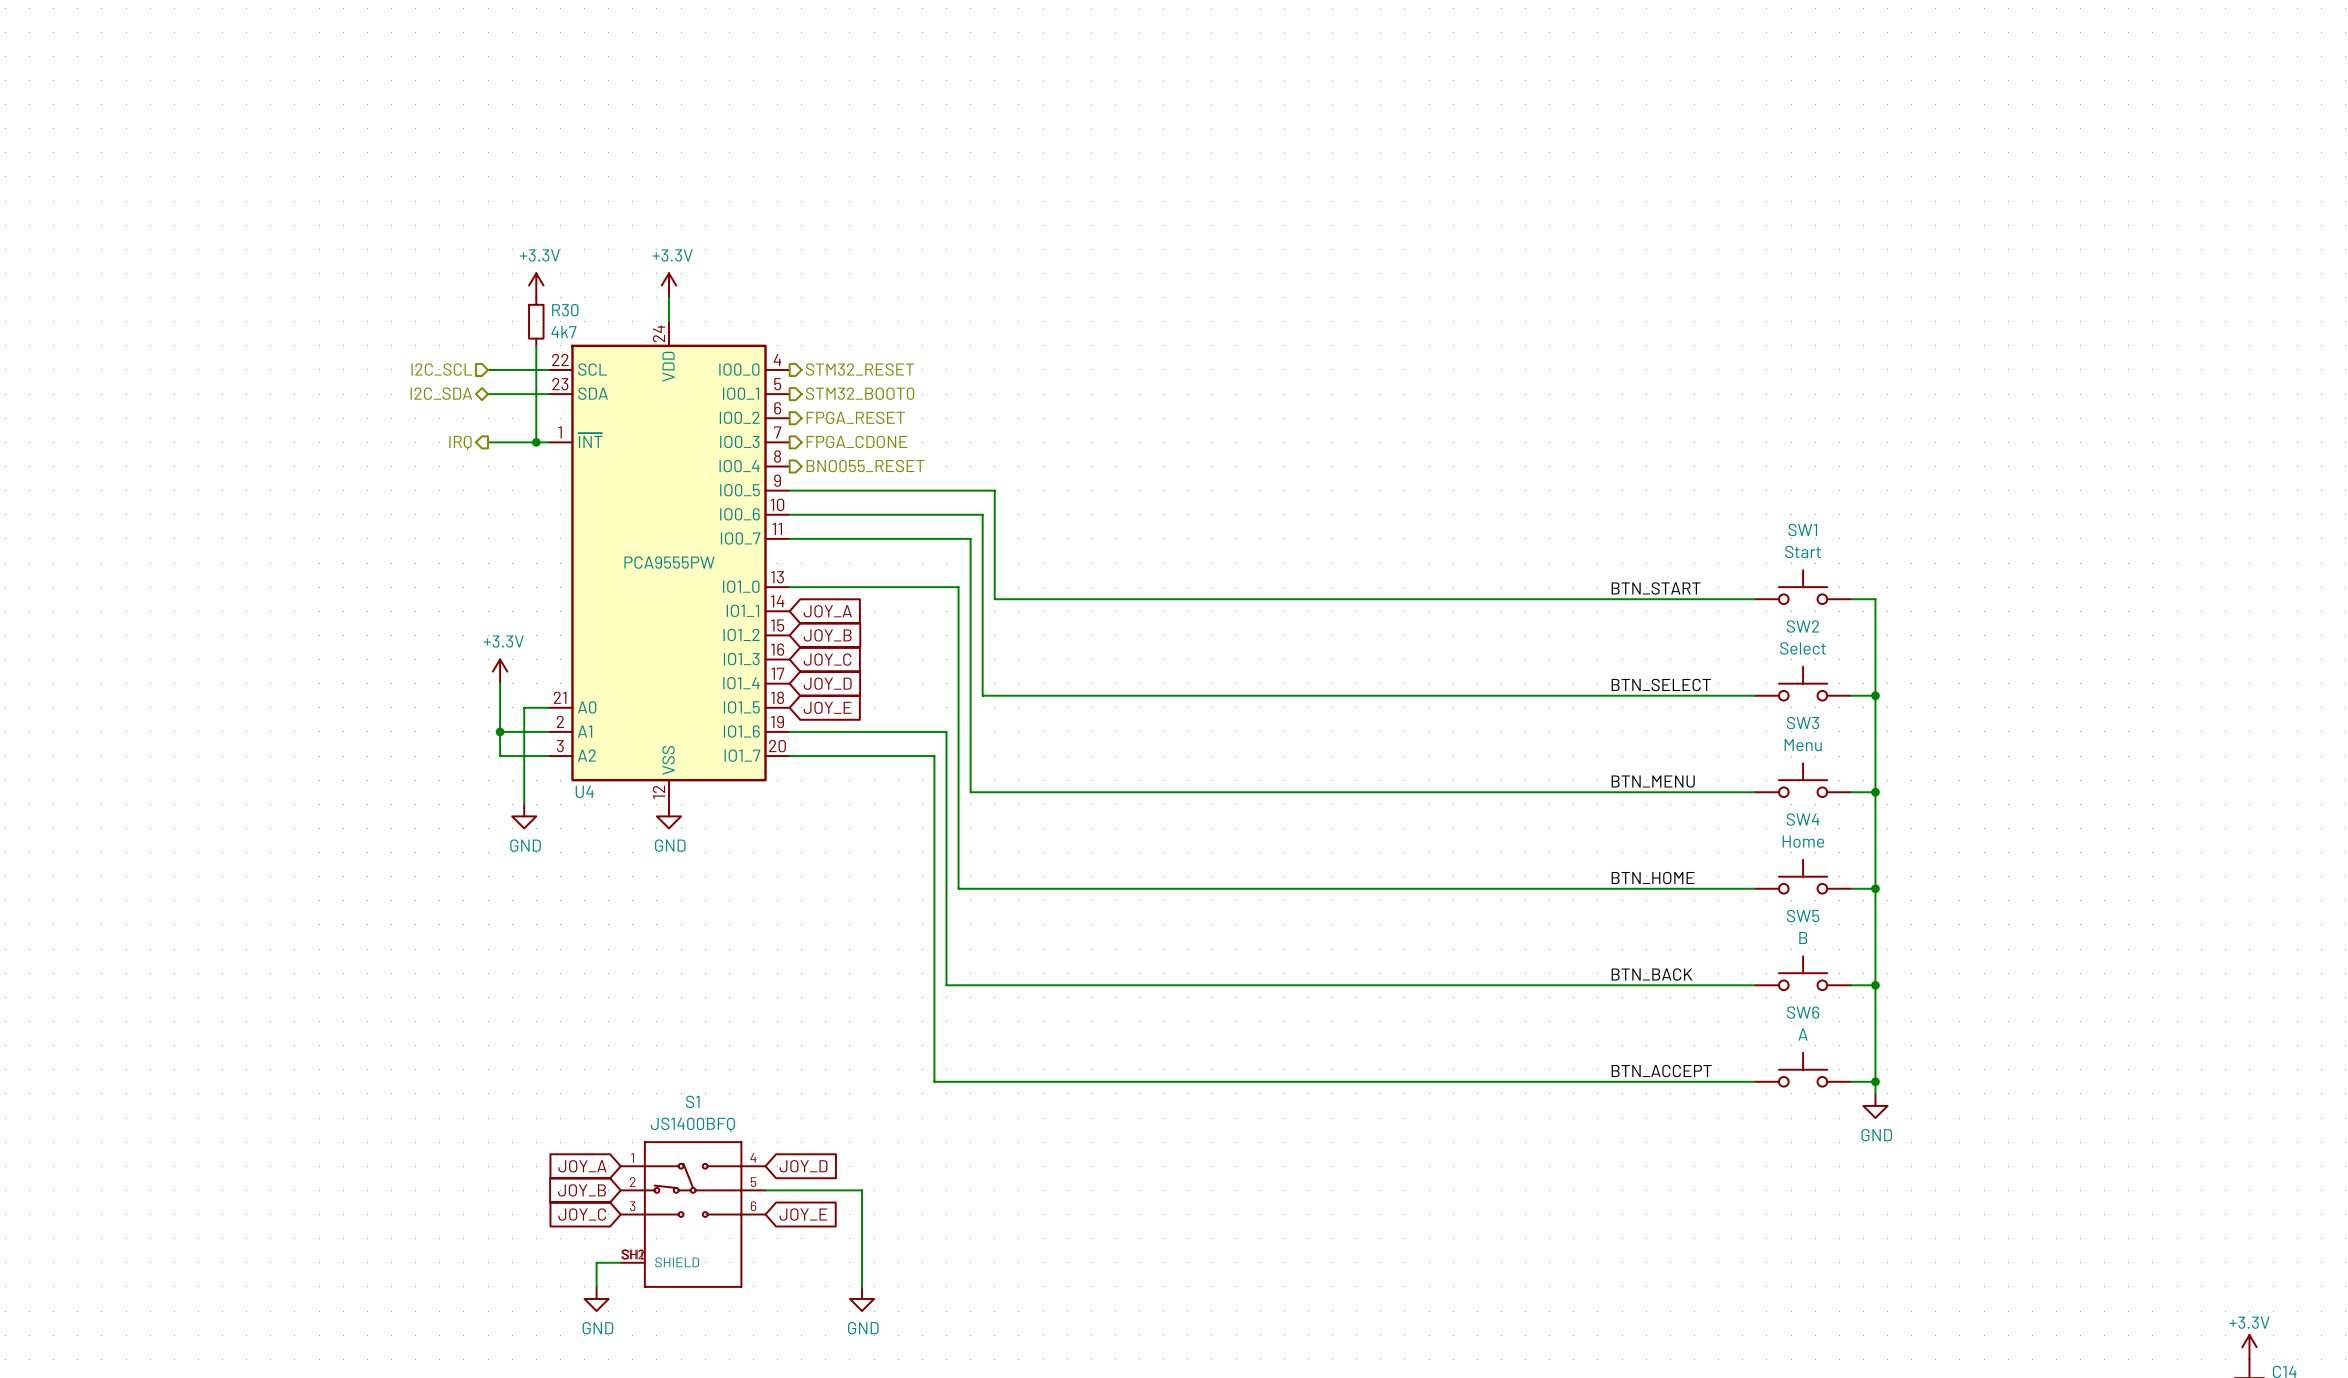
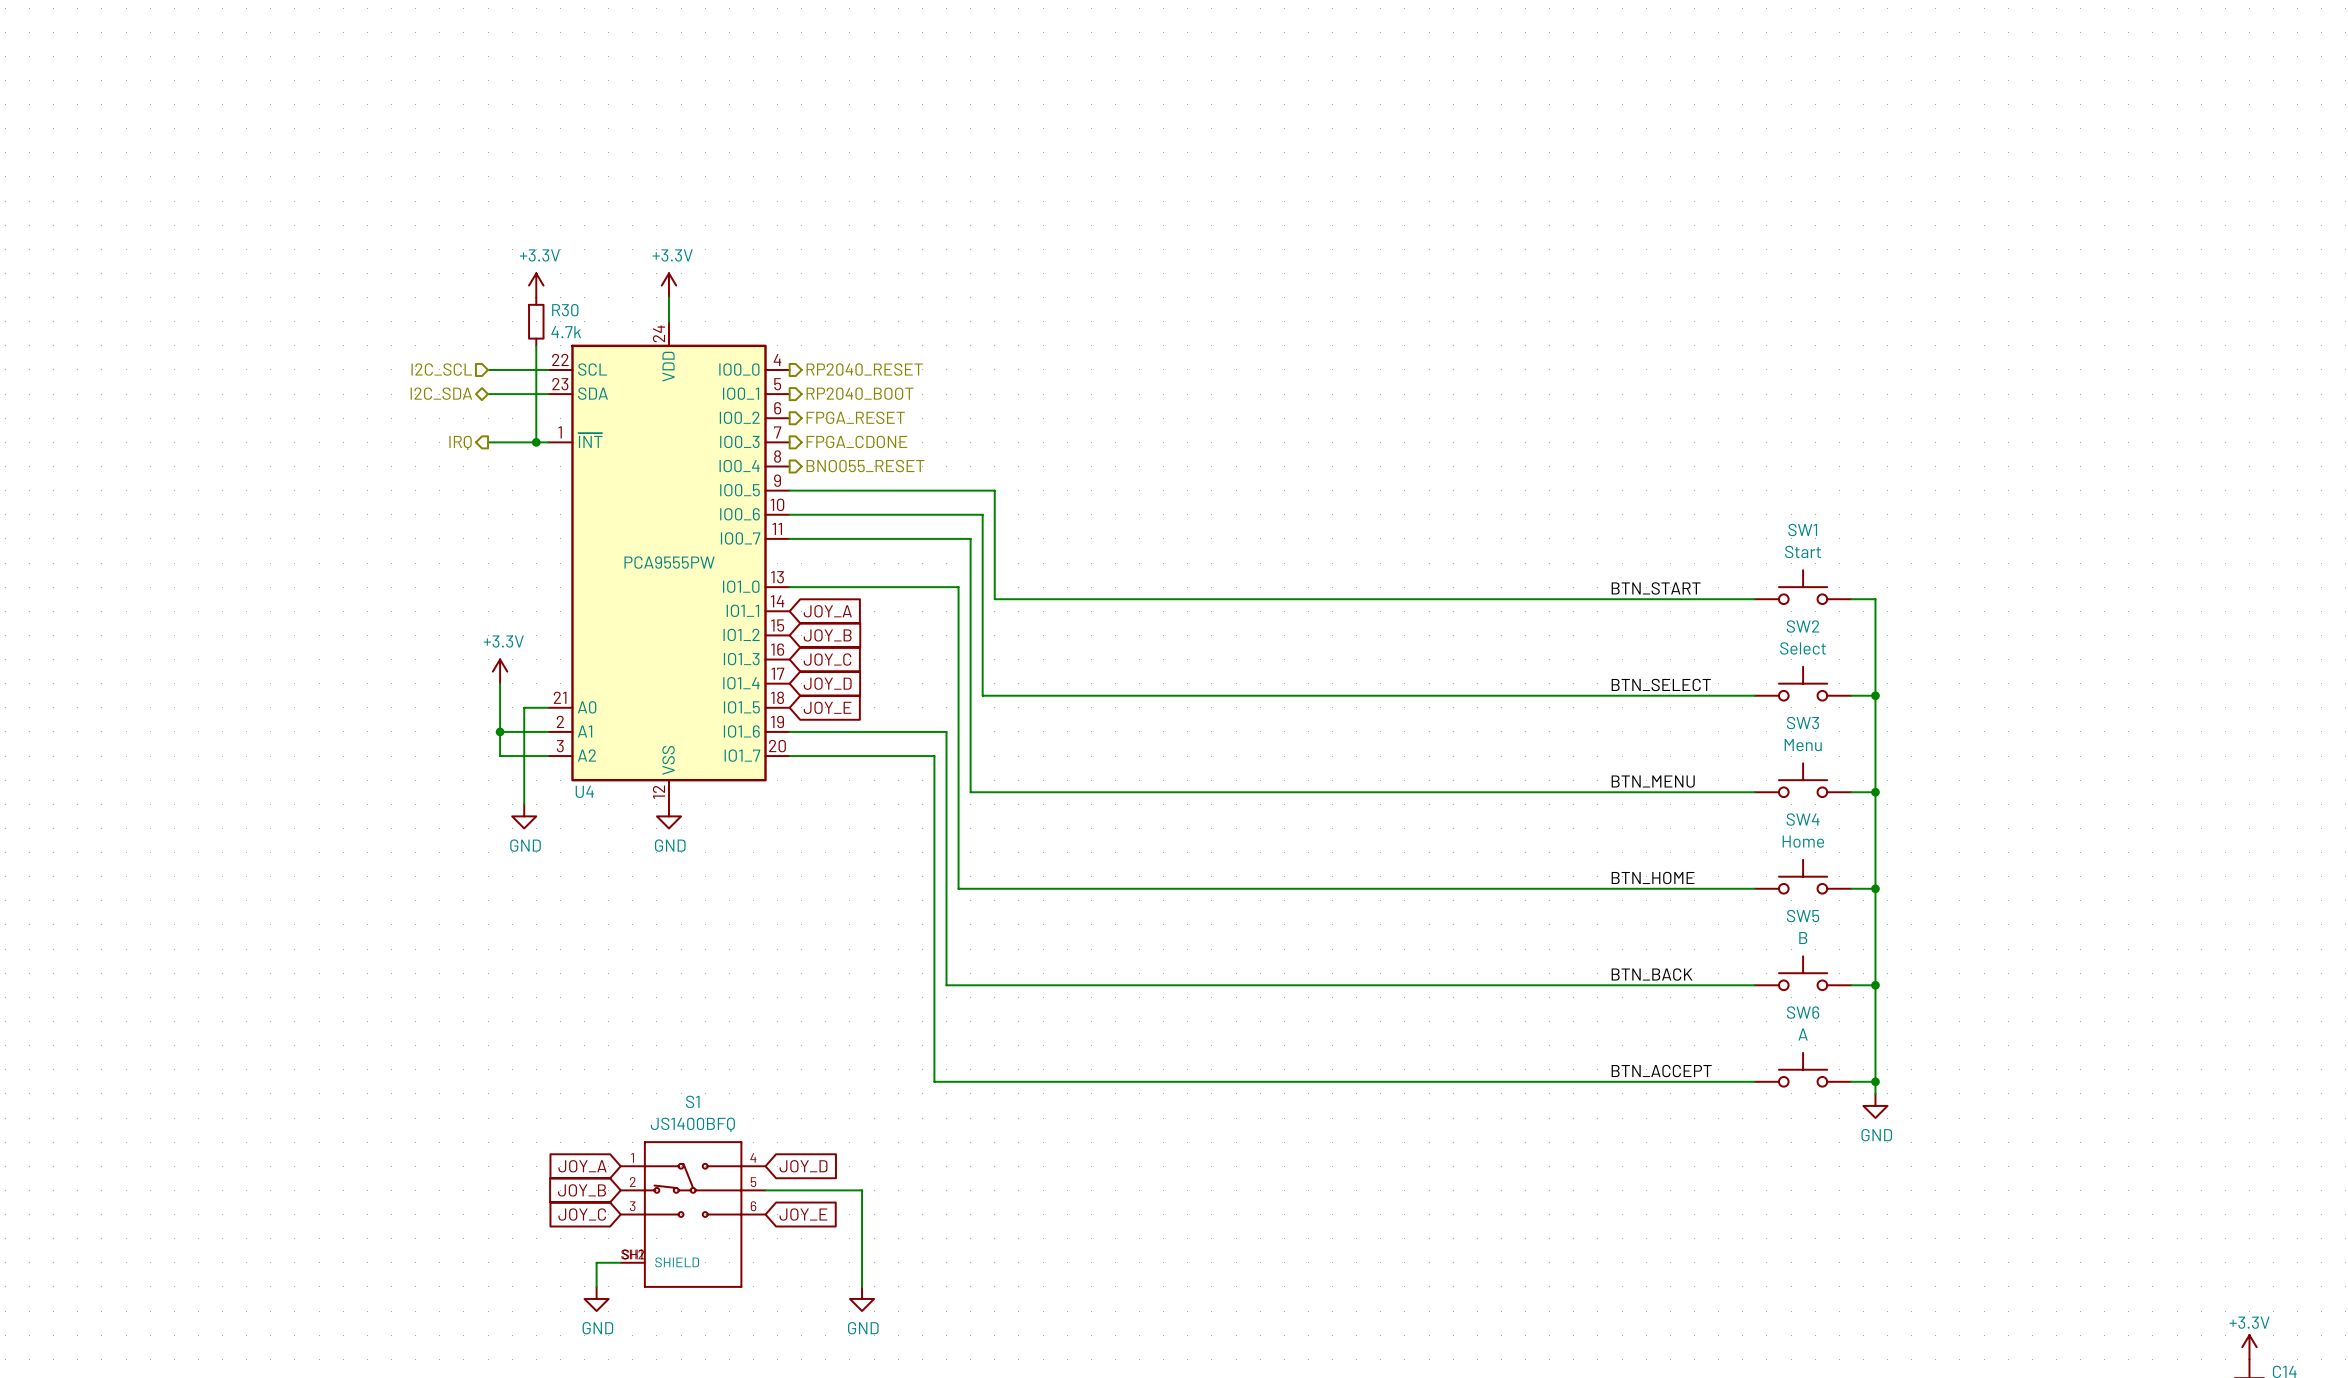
R30 value: 4k7 (563, 332) -> 4.7k (566, 332)
hierarchical label: STM32_RESET (860, 369) -> RP2040_RESET (864, 369)
hierarchical label: STM32_BOOT0 (860, 393) -> RP2040_BOOT (860, 393)

